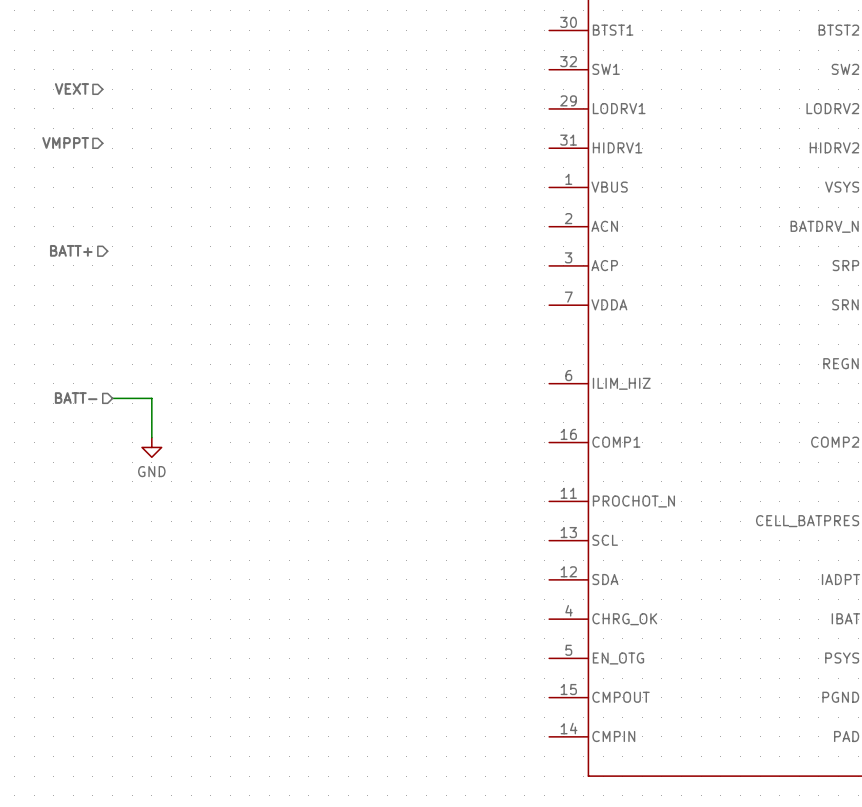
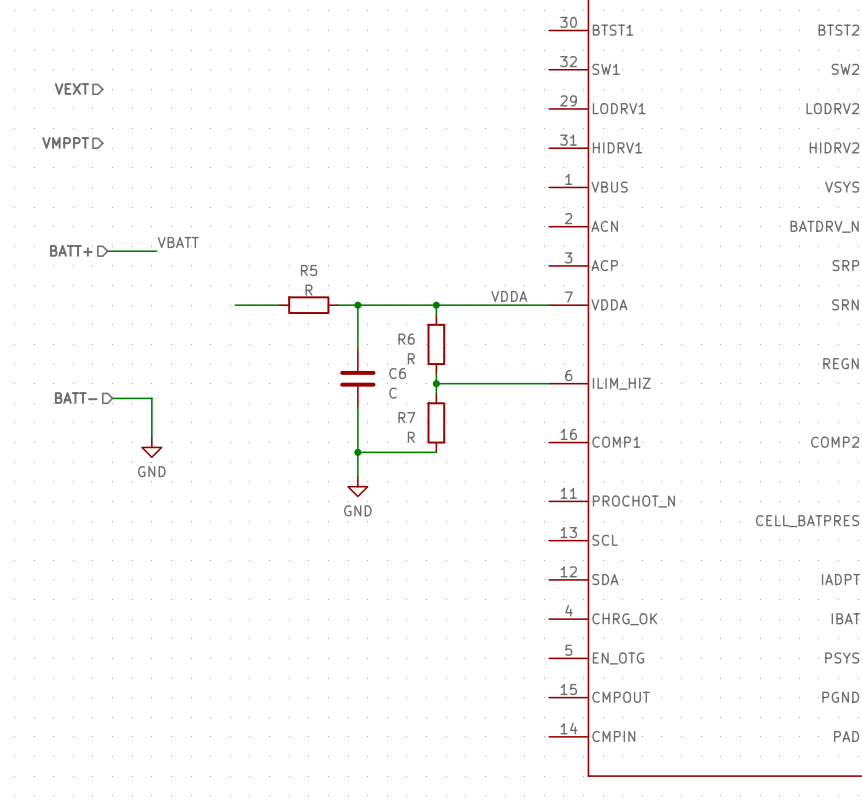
label: none -> VBATT (178, 242)
wire: none -> (107, 251) (156, 251)
label: none -> VDDA (509, 296)
wire: none -> (235, 305) (279, 305)
R5: none -> R (308, 305)
wire: none -> (338, 305) (549, 305)
wire: none -> (357, 305) (357, 349)
junction: none -> (357, 305)
wire: none -> (436, 305) (436, 315)
junction: none -> (436, 305)
R6: none -> R (436, 344)
wire: none -> (436, 373) (436, 393)
C6: none -> C (357, 378)
wire: none -> (436, 383) (549, 383)
junction: none -> (436, 383)
wire: none -> (357, 408) (357, 476)
R7: none -> R (436, 422)
wire: none -> (357, 452) (436, 452)
junction: none -> (357, 452)
power symbol: none -> GND (357, 486)

